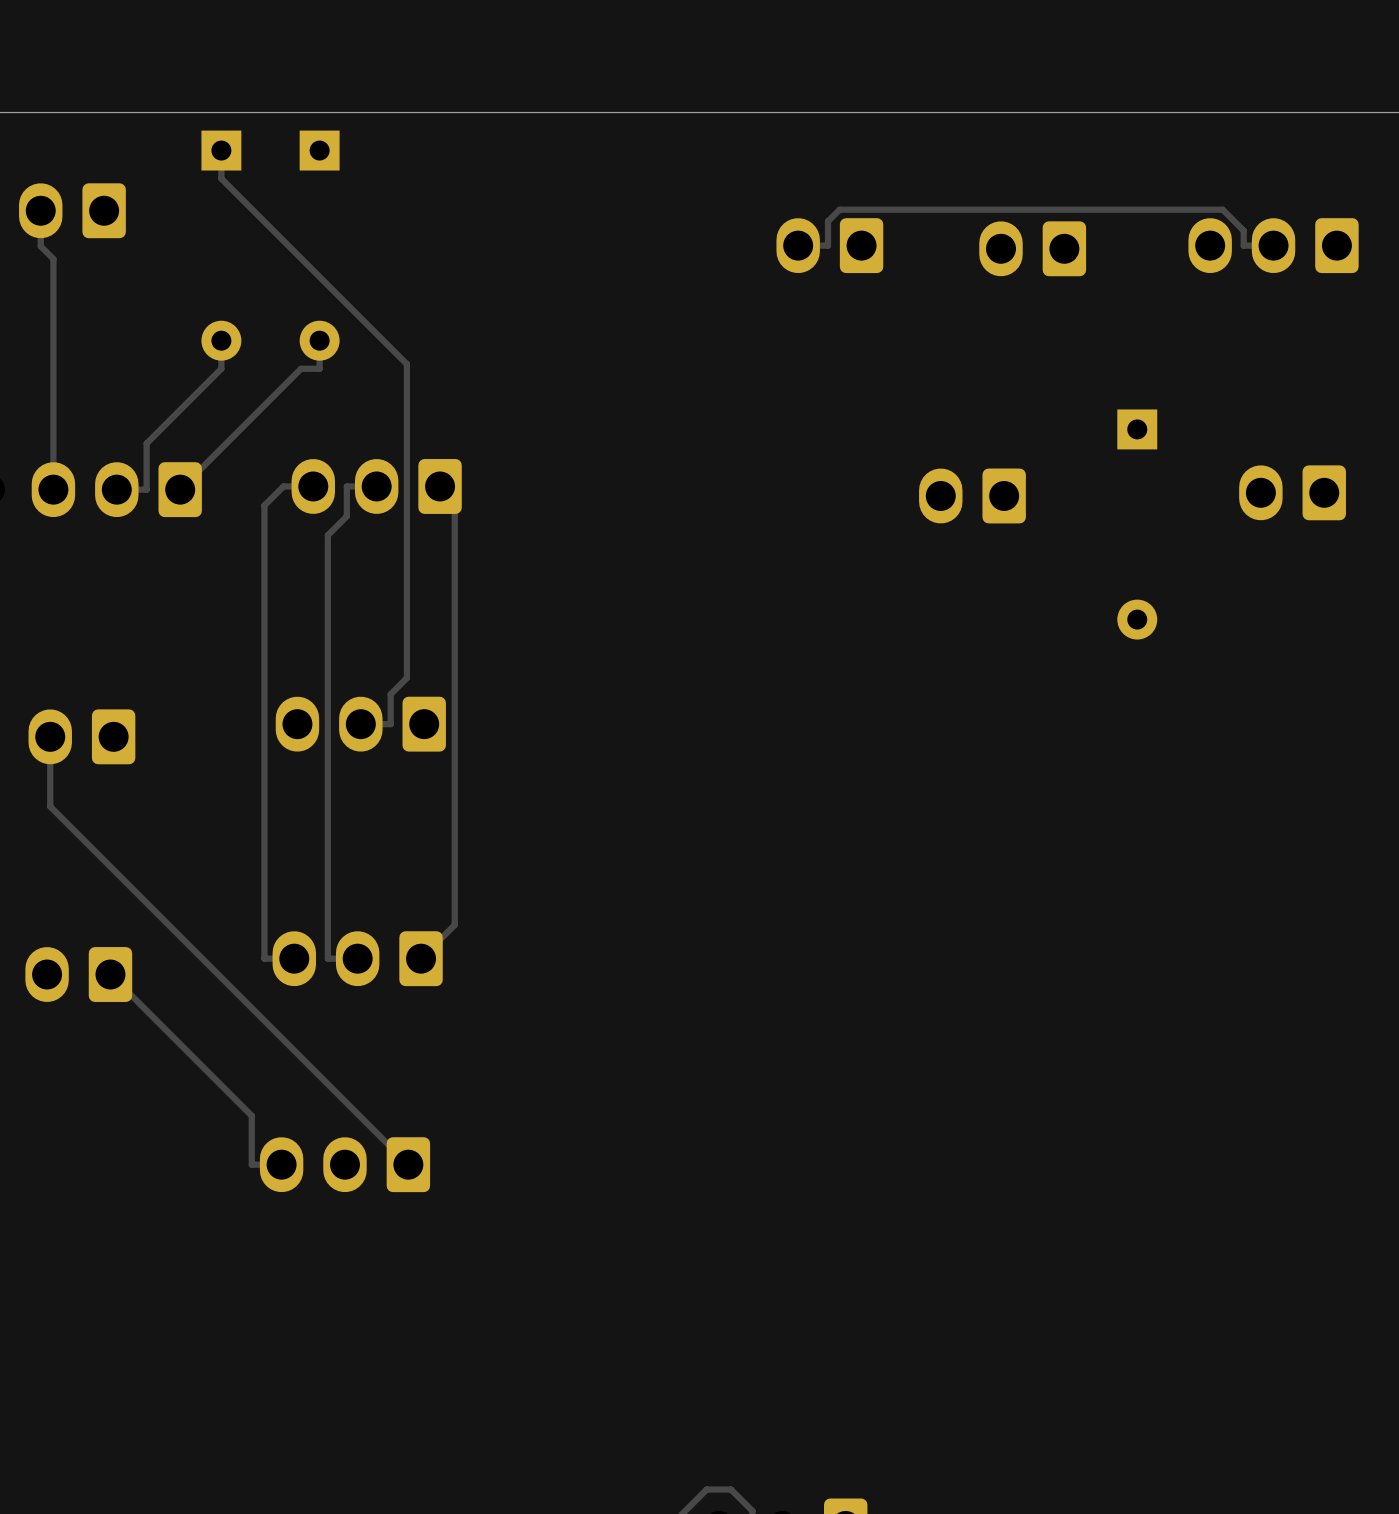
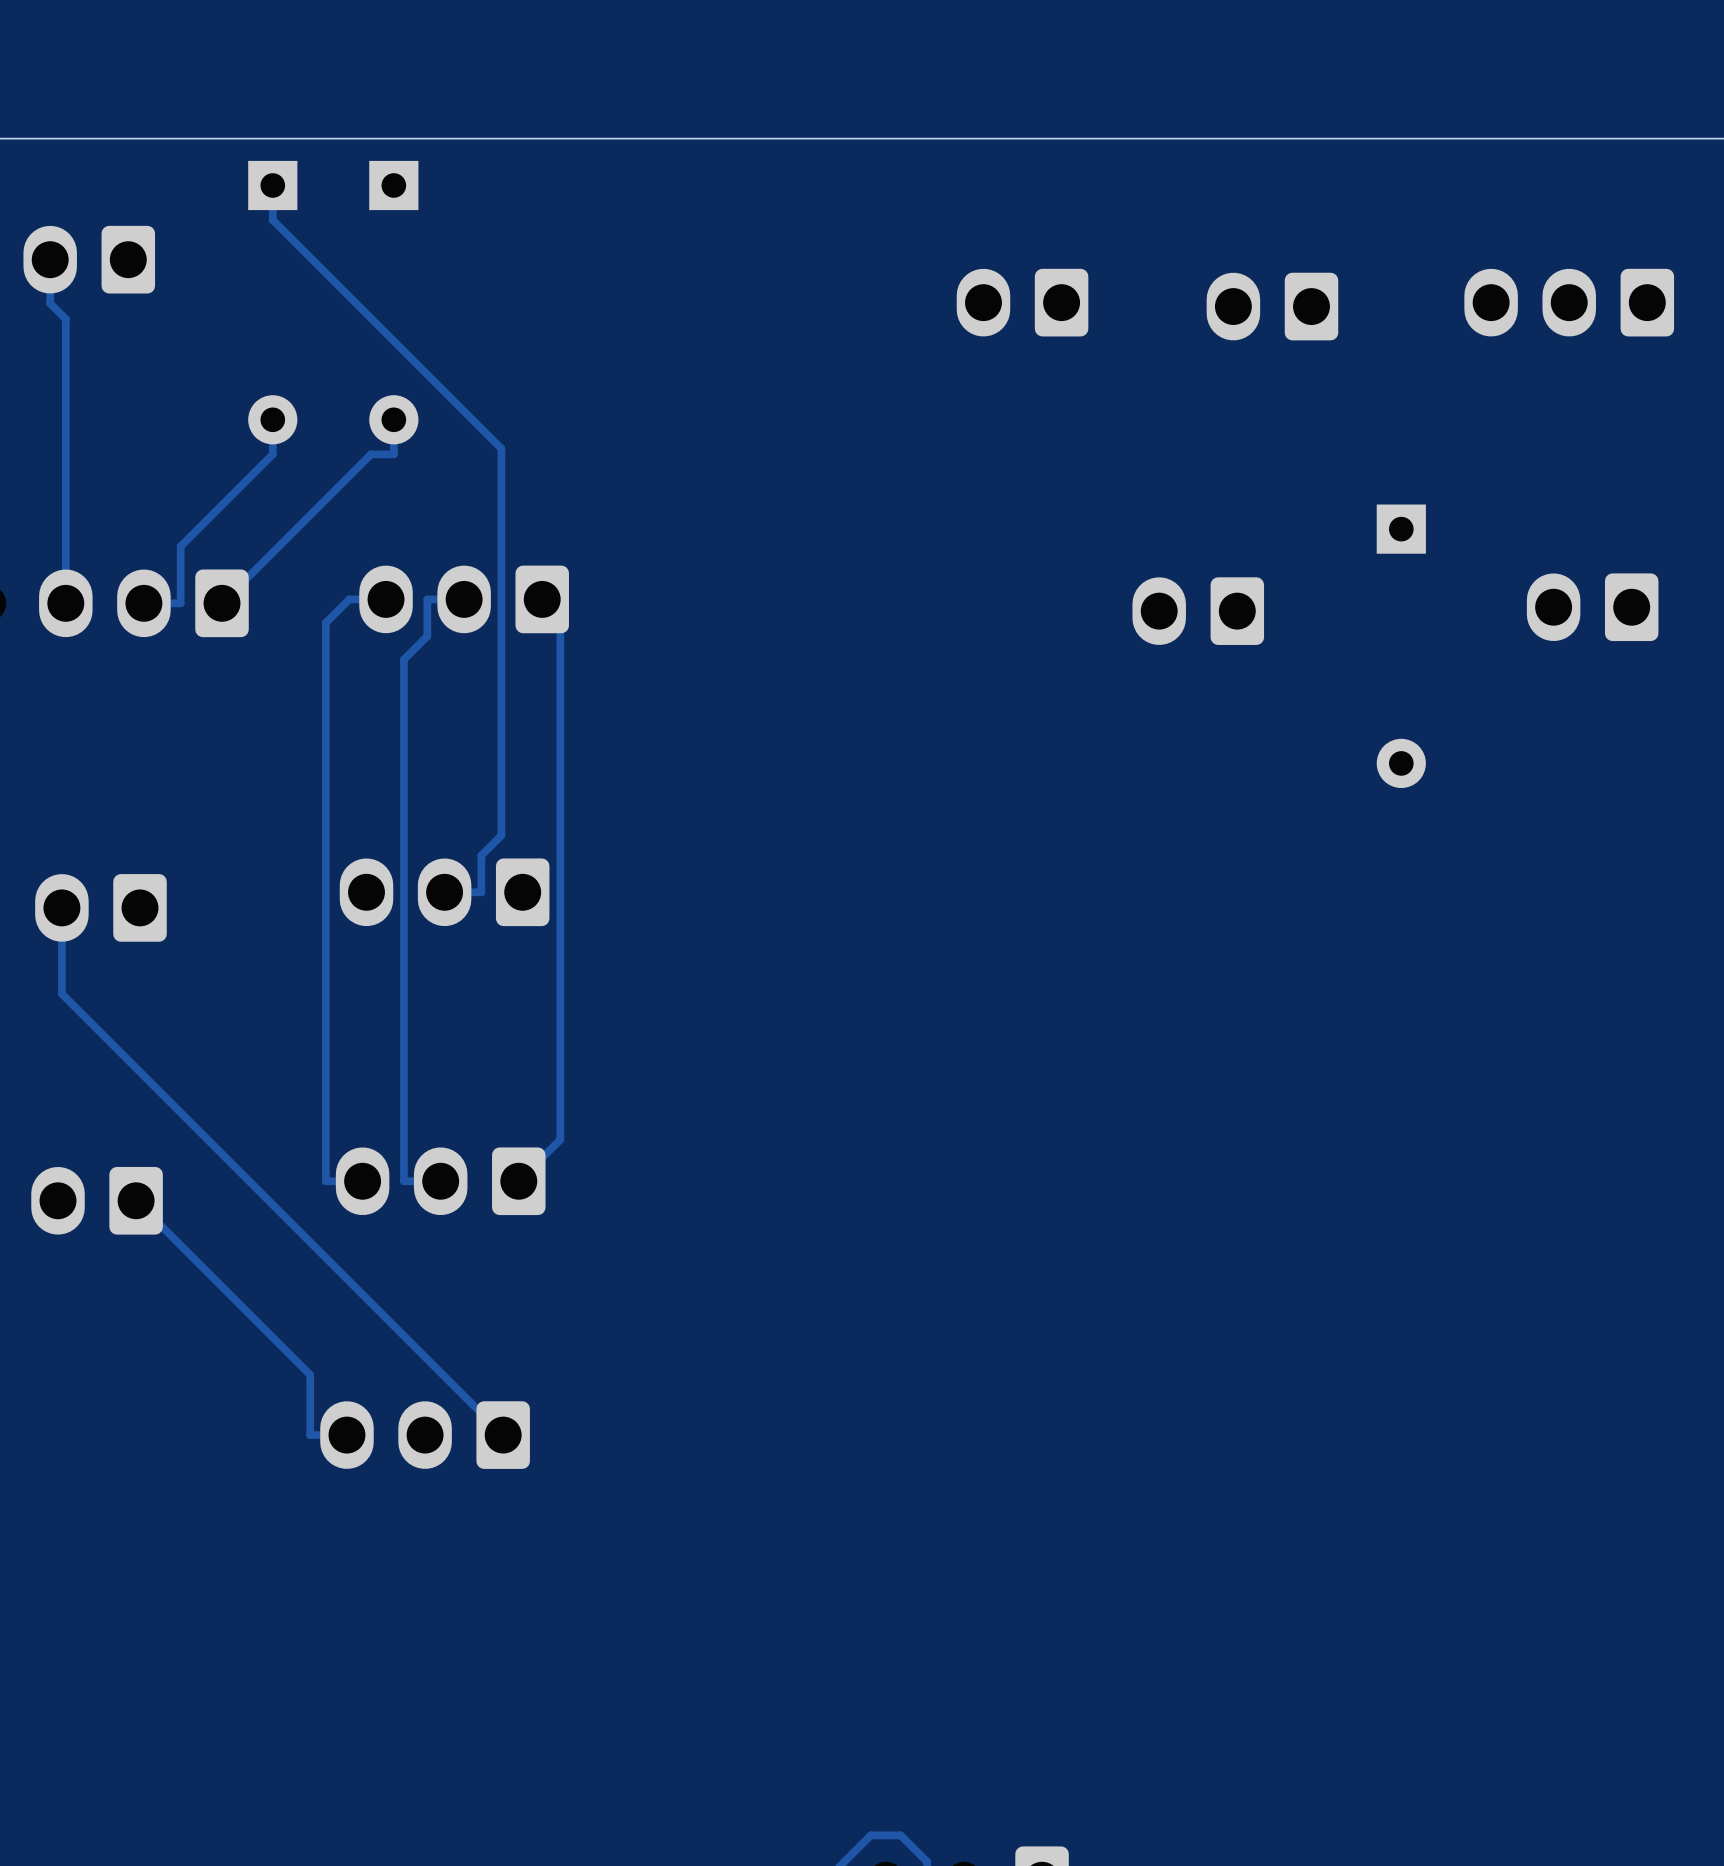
track: (1273, 245) (1243, 245) (1243, 230) (1222, 209) (839, 209) (828, 221) (828, 245) (798, 245) -> none

